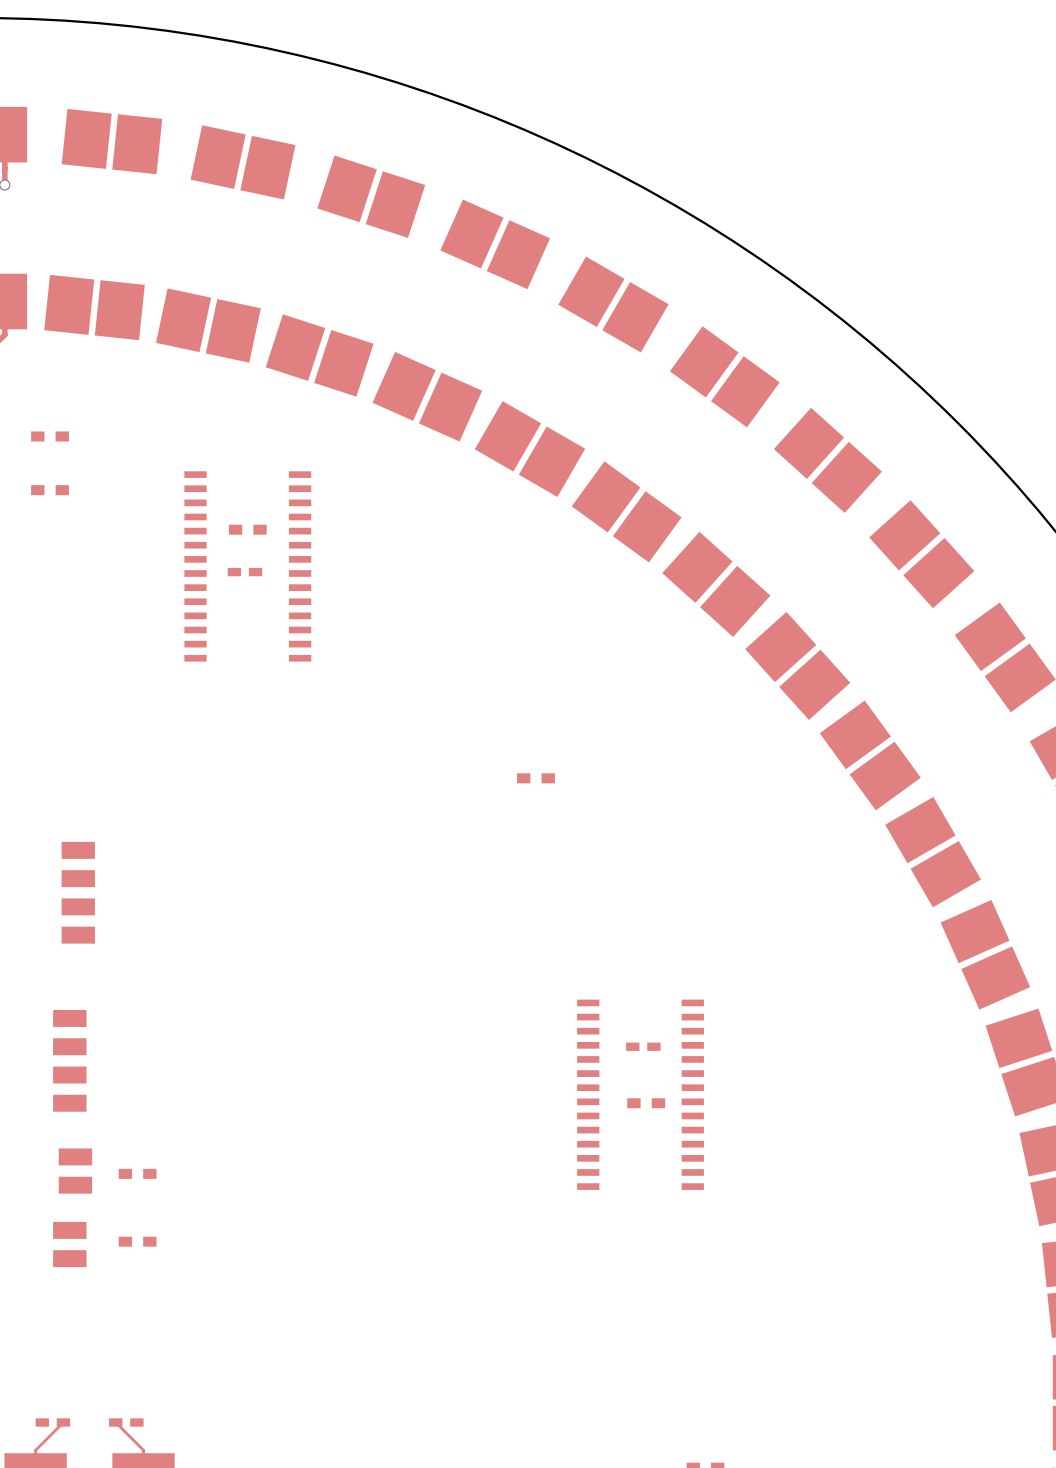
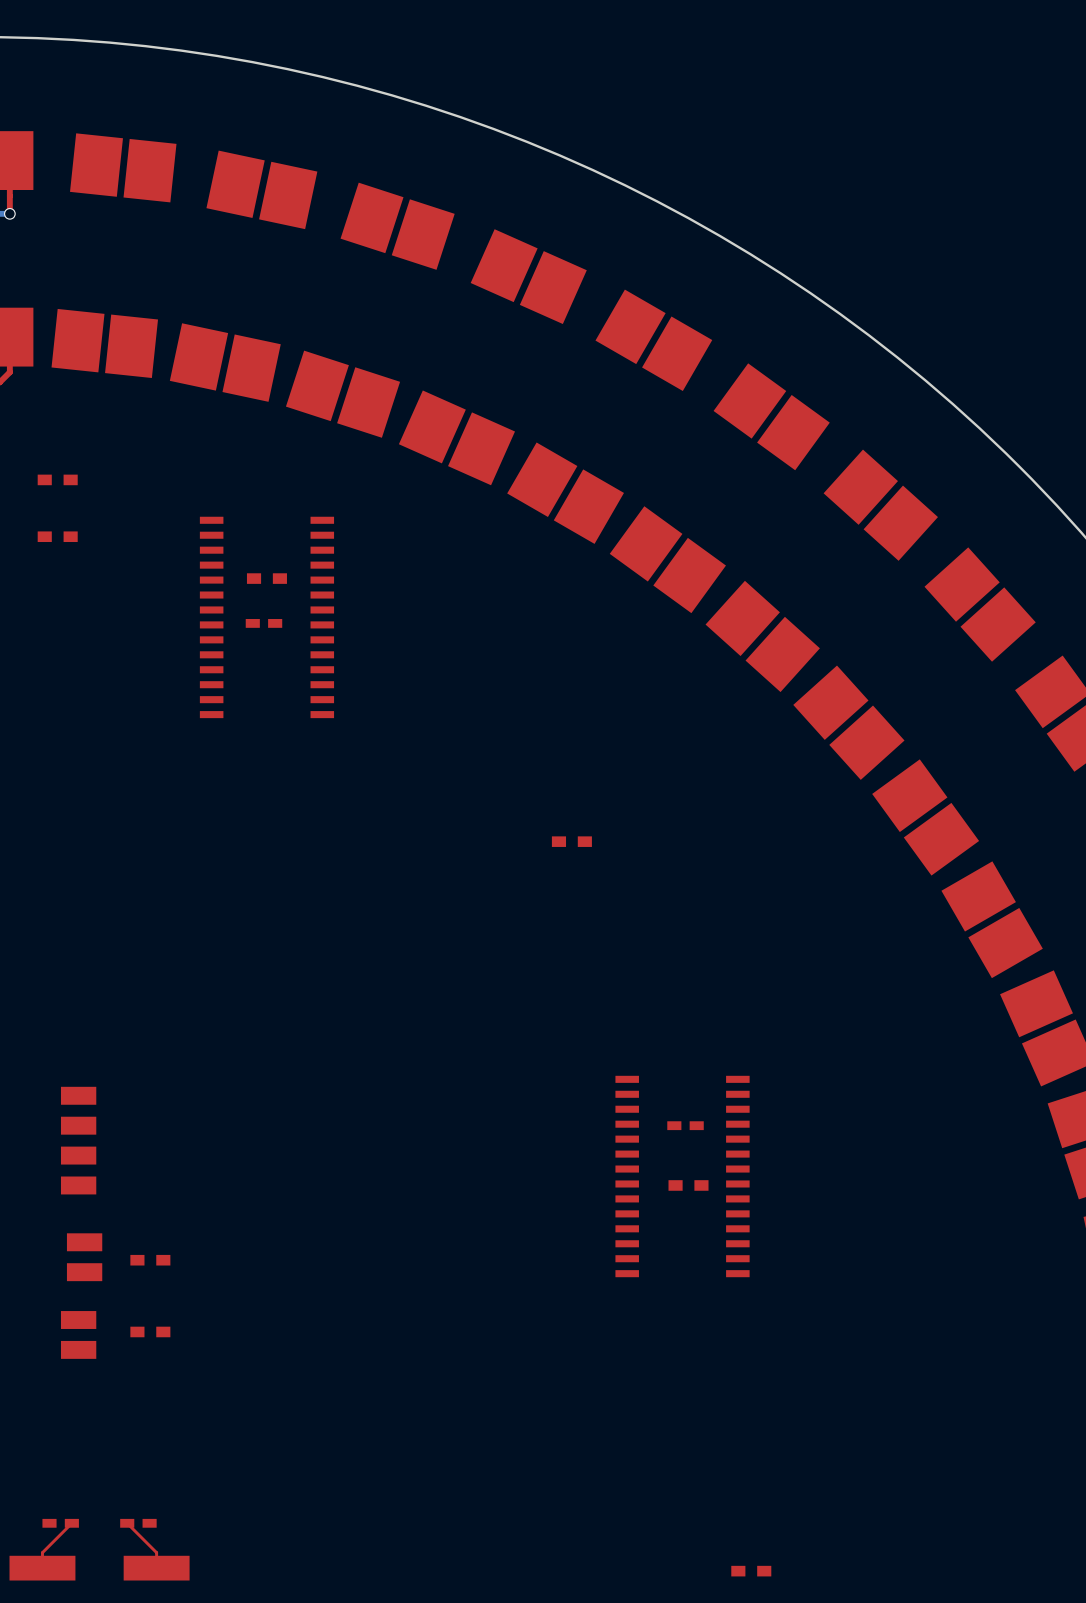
part: (78, 892) -> none

